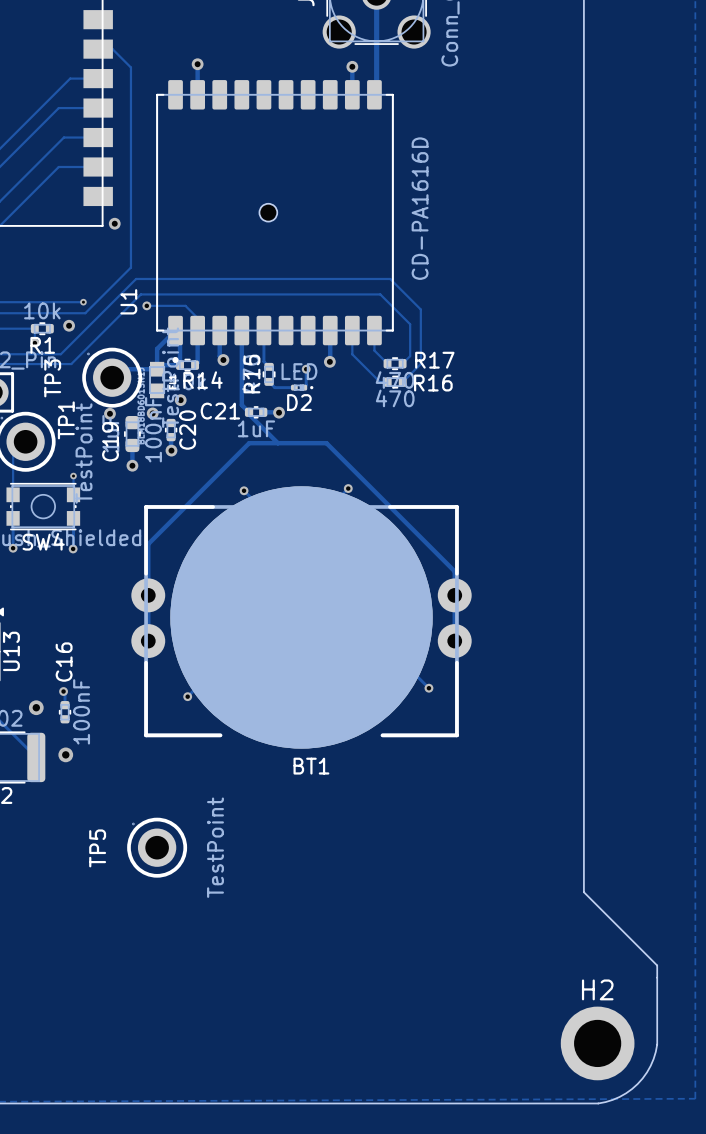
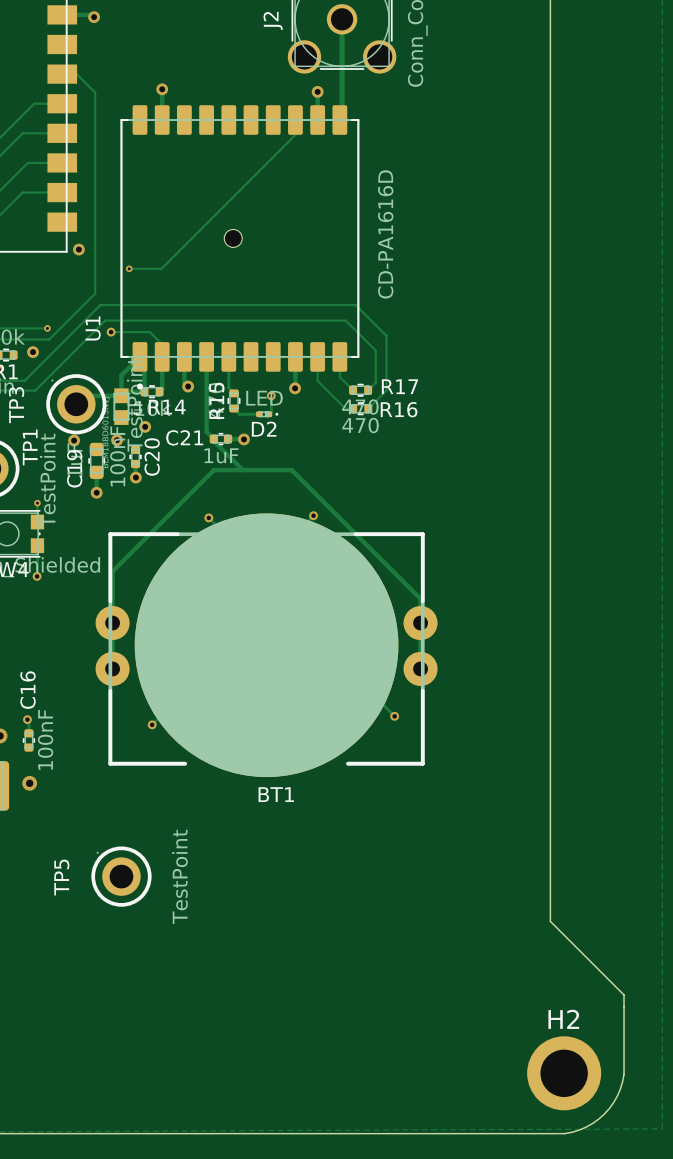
track: none -> (295, 120) (295, 134) (161, 268) (129, 268)
via: none -> (129, 268)

